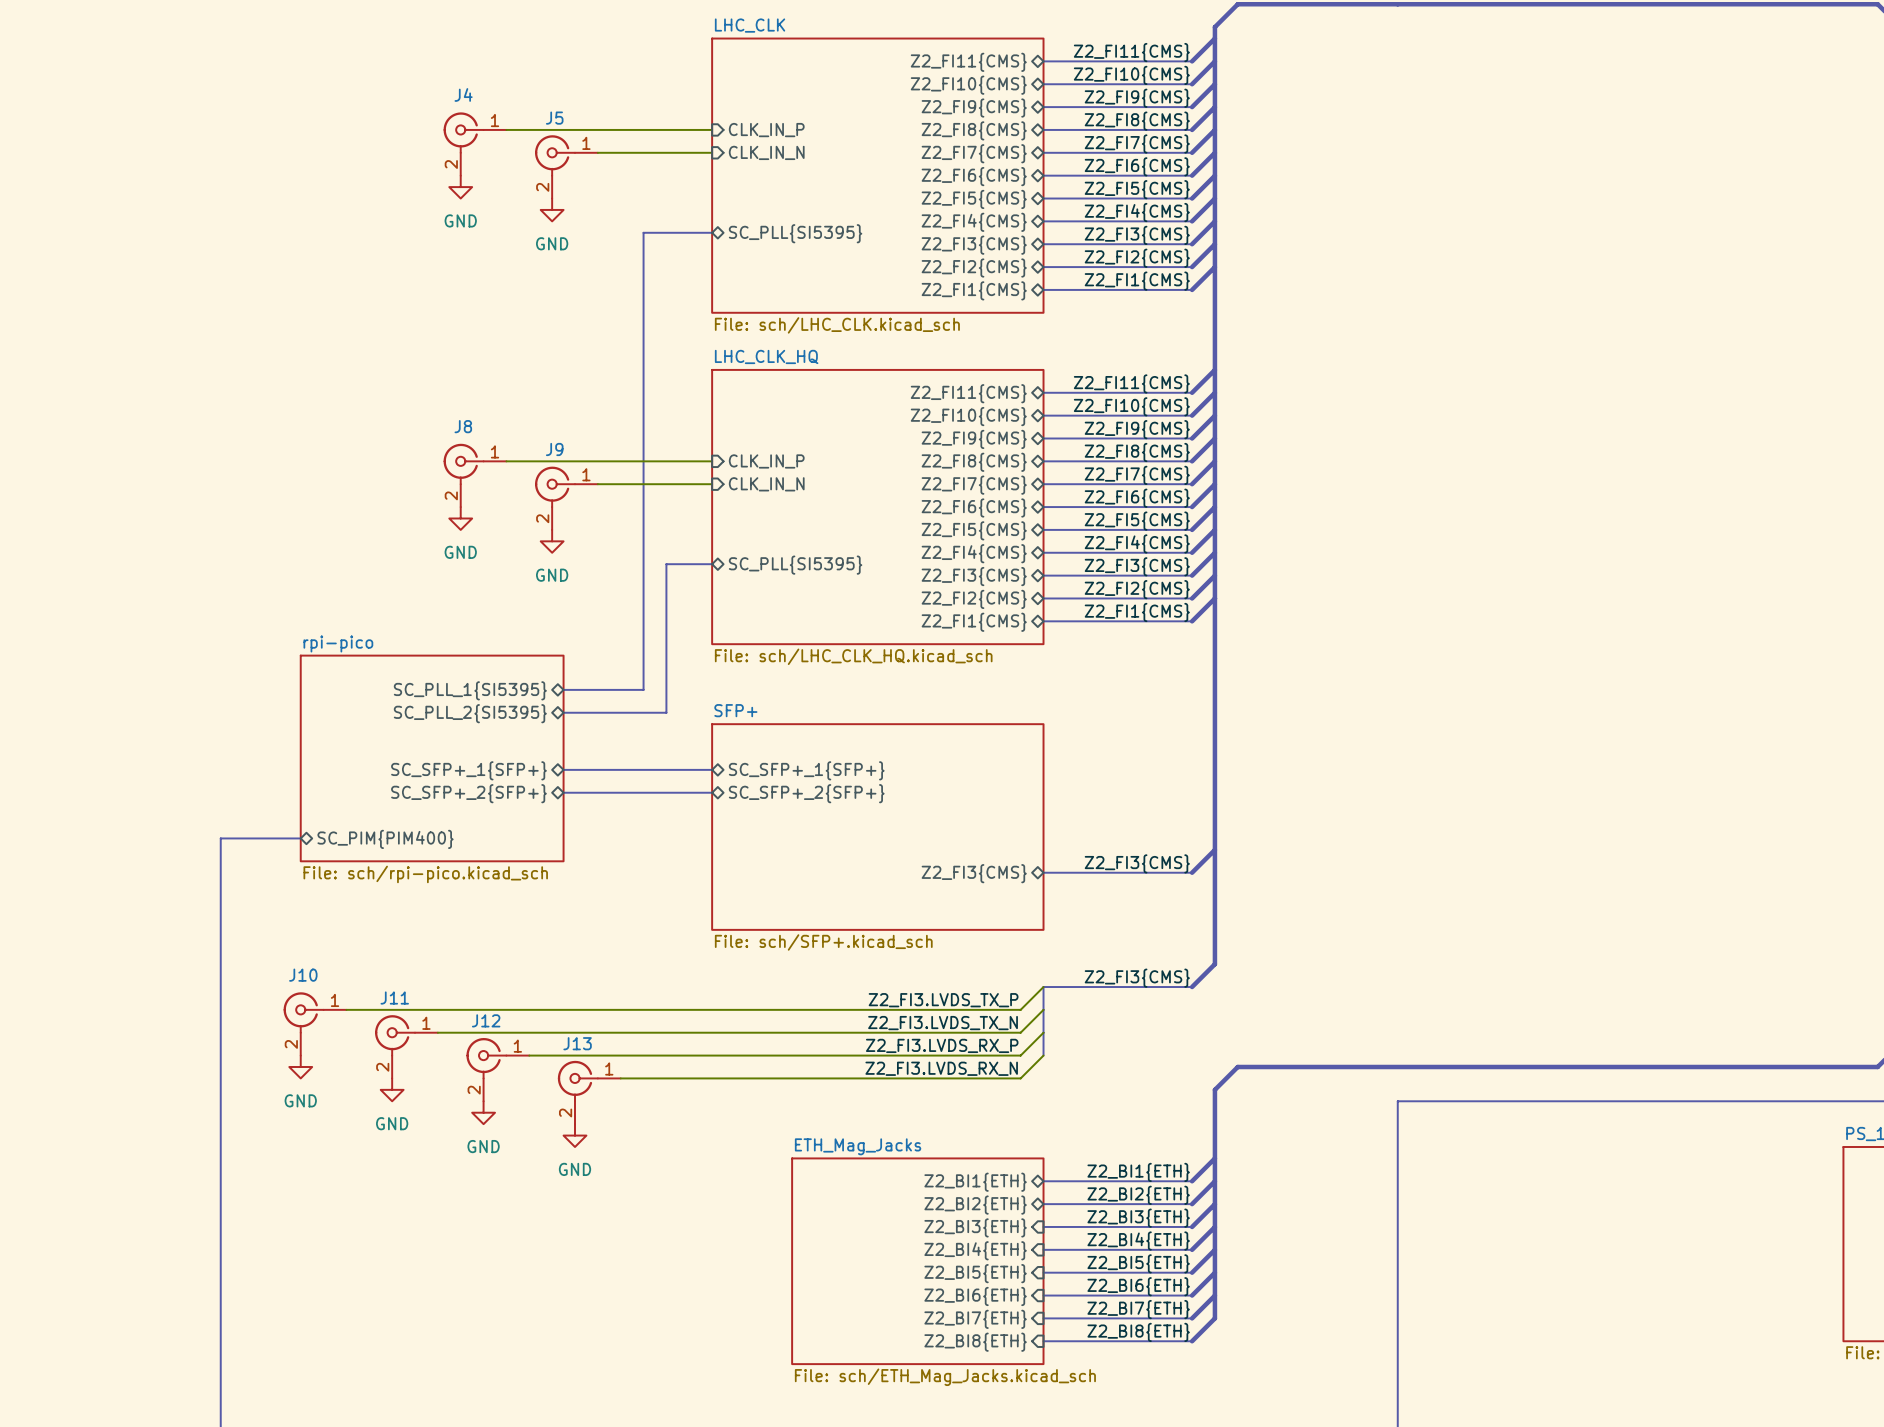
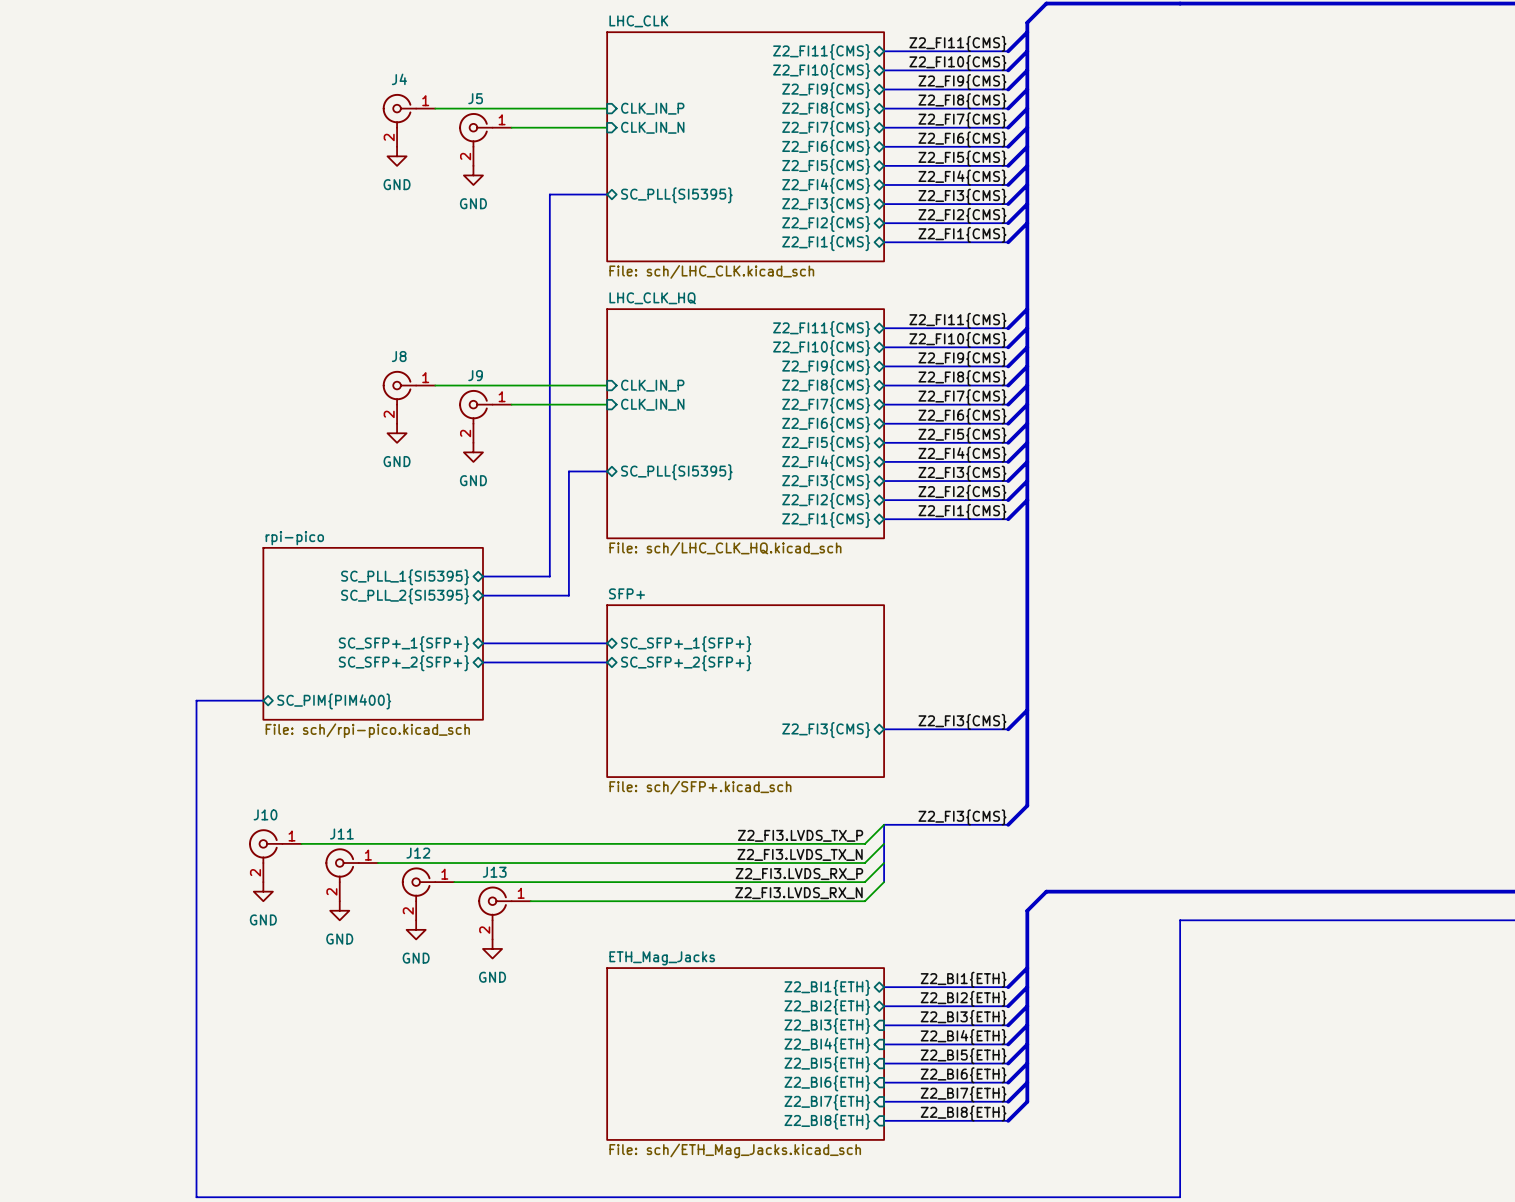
sheet ETH_Mag_Jacks: none -> File: sch/ETH_Mag_Jacks.kicad_sch (745, 1054)
sheet ETH_Mag_Jacks: File: sch/ETH_Mag_Jacks.kicad_sch (917, 1261) -> none

